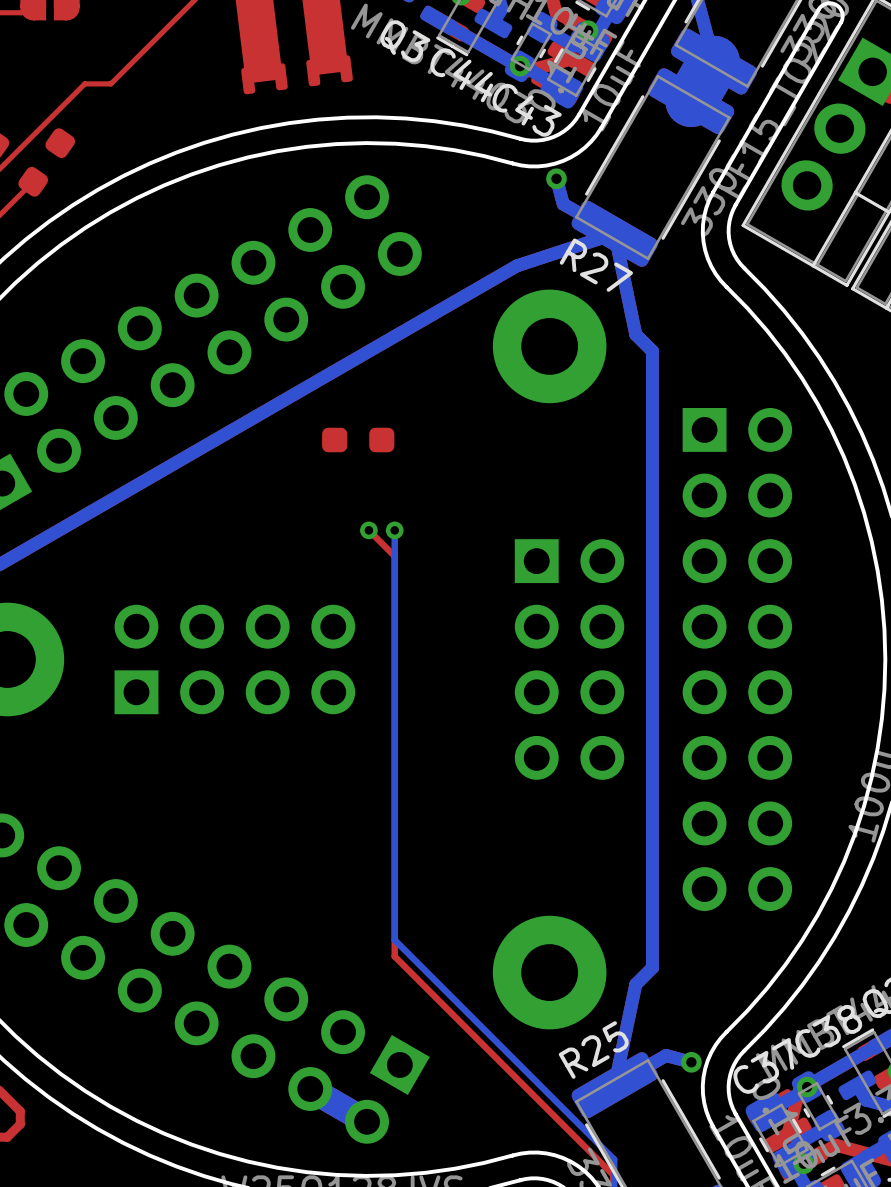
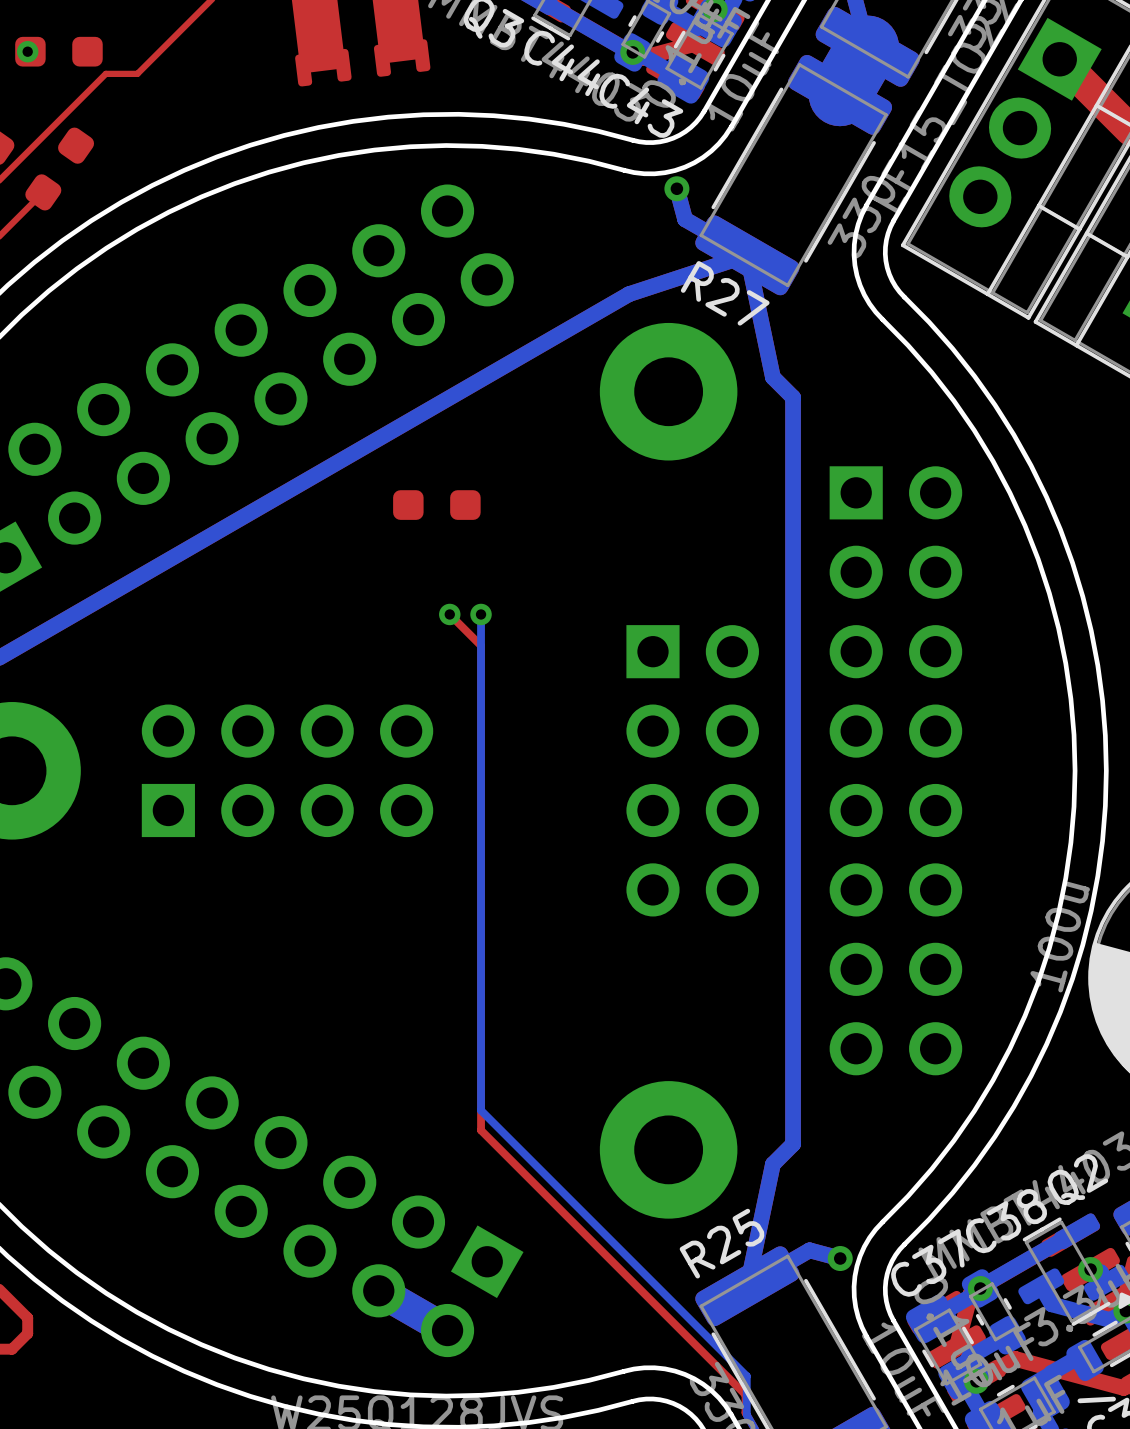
via: none -> (27, 51)
part: none -> (58, 51)

